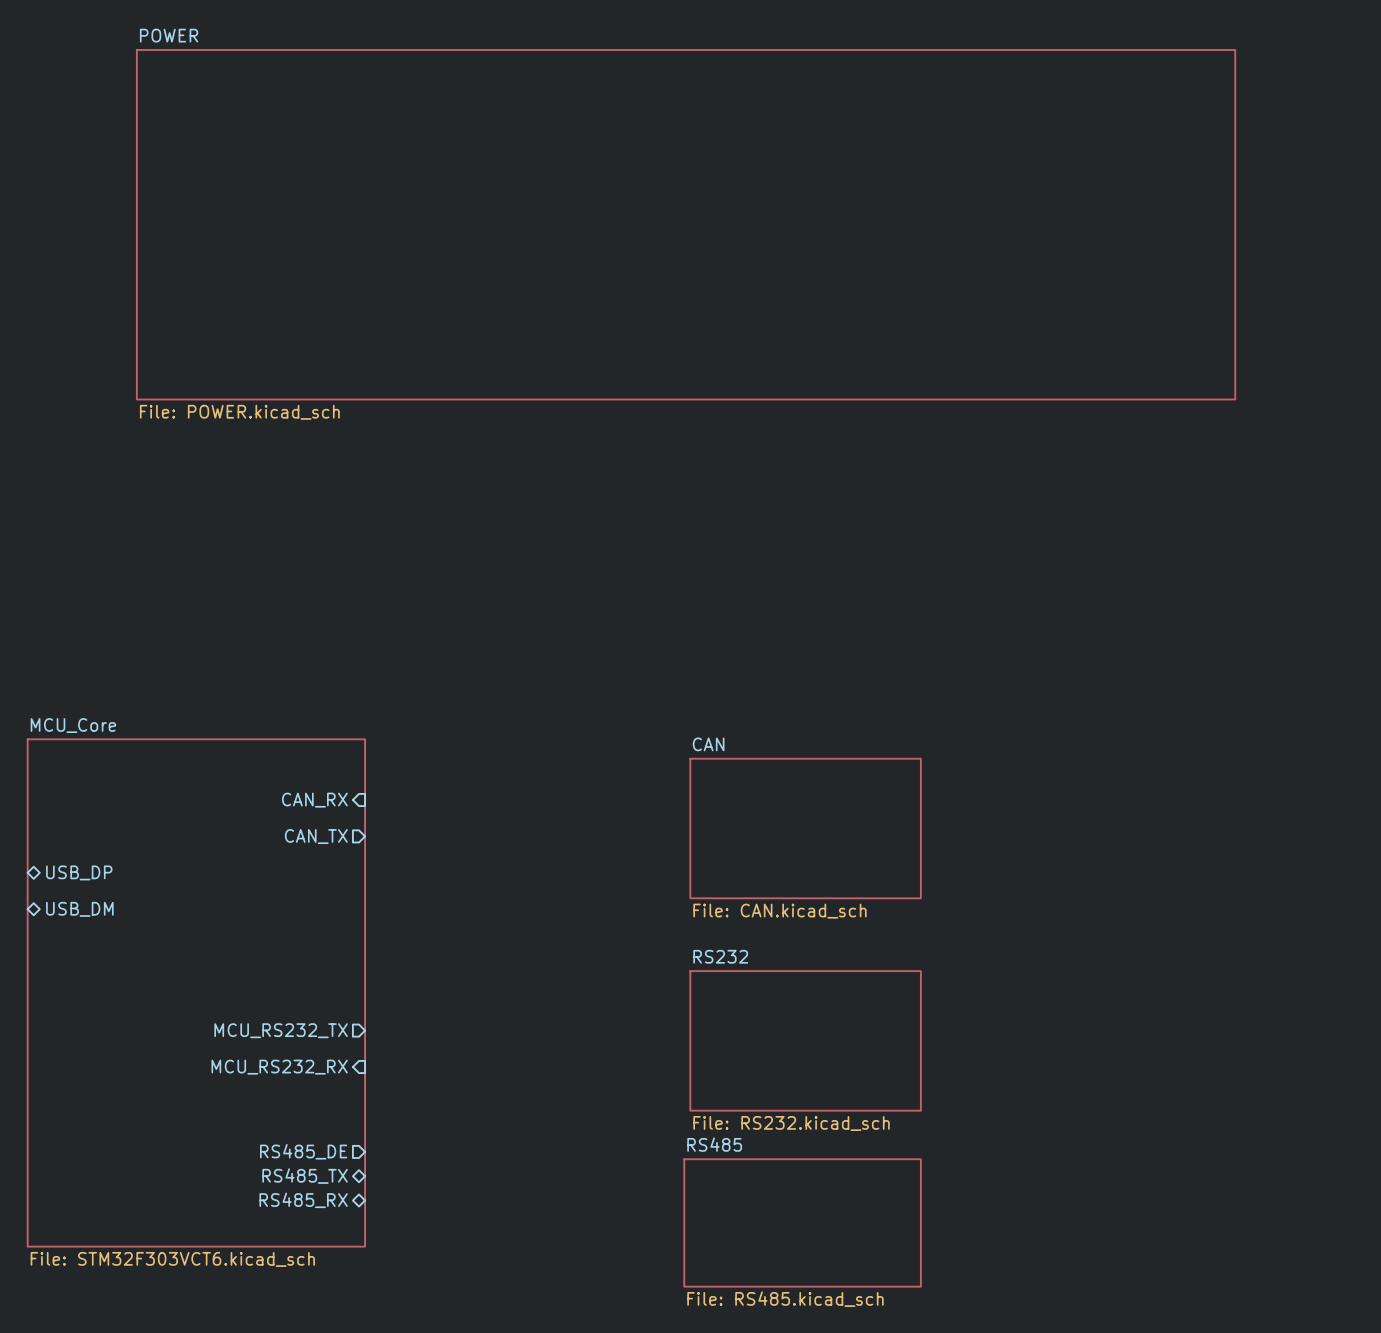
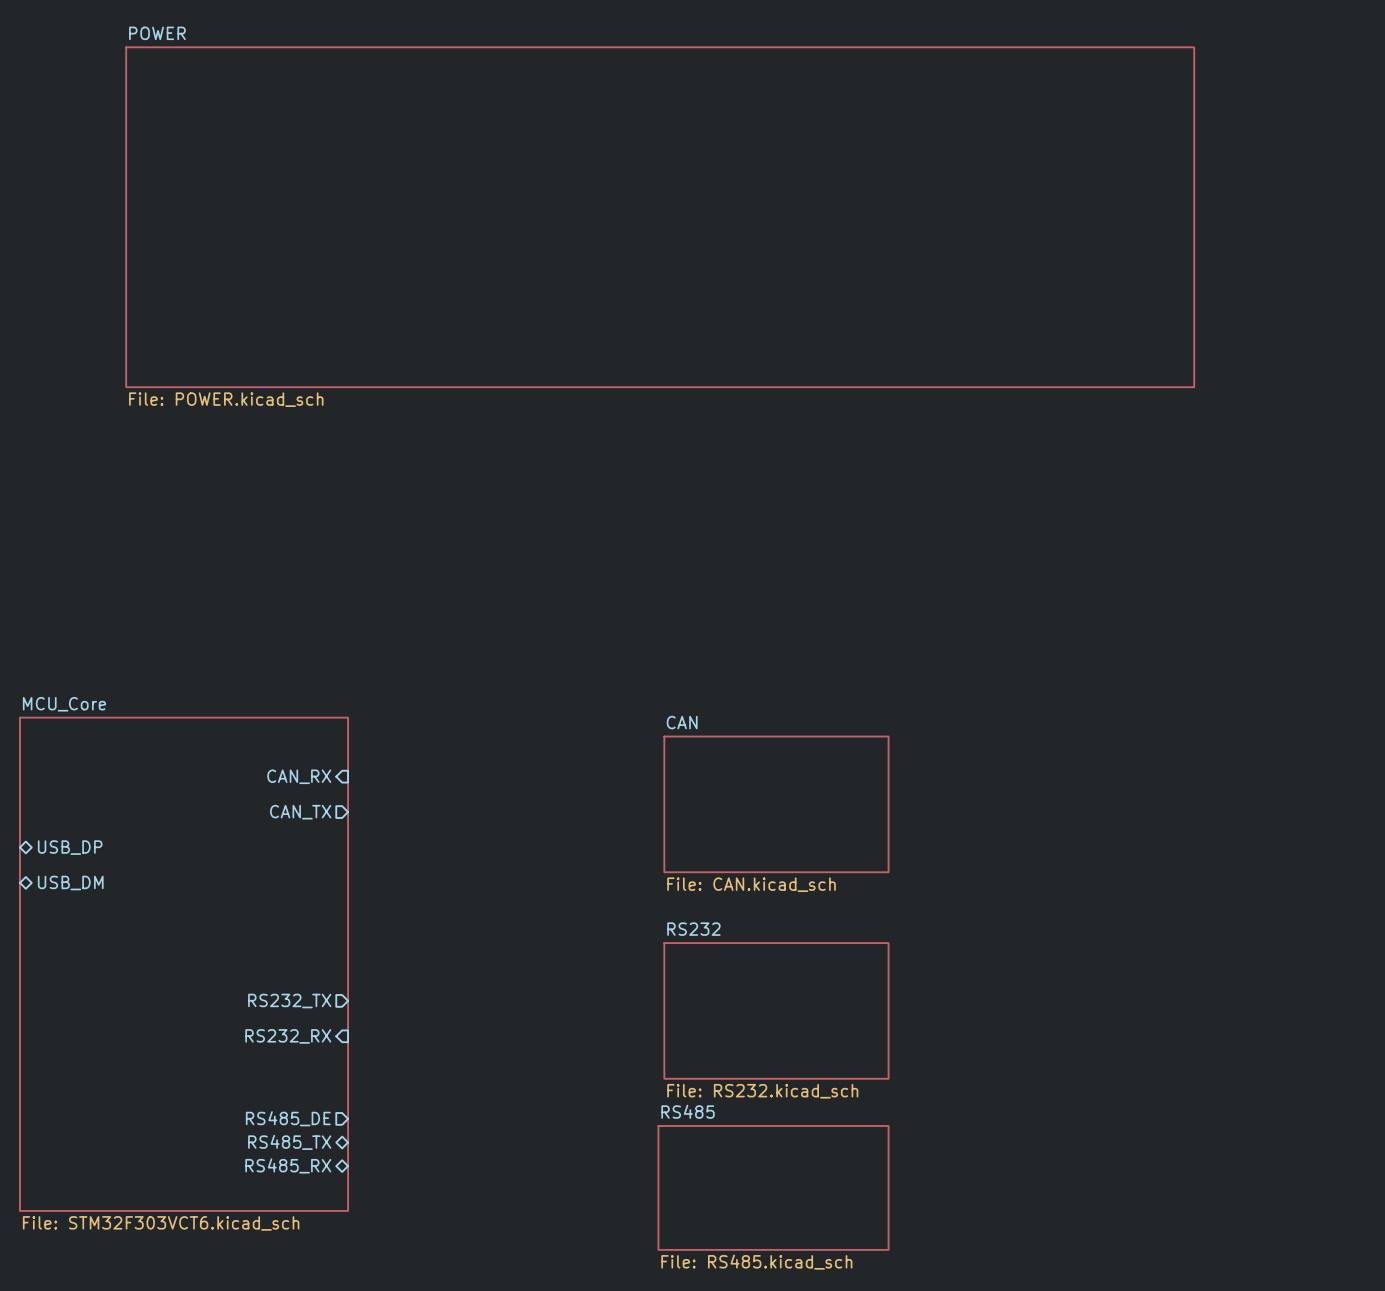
sheet pin: MCU_RS232_TX (281, 1030) -> RS232_TX (289, 1001)
sheet pin: MCU_RS232_RX (279, 1067) -> RS232_RX (288, 1036)

